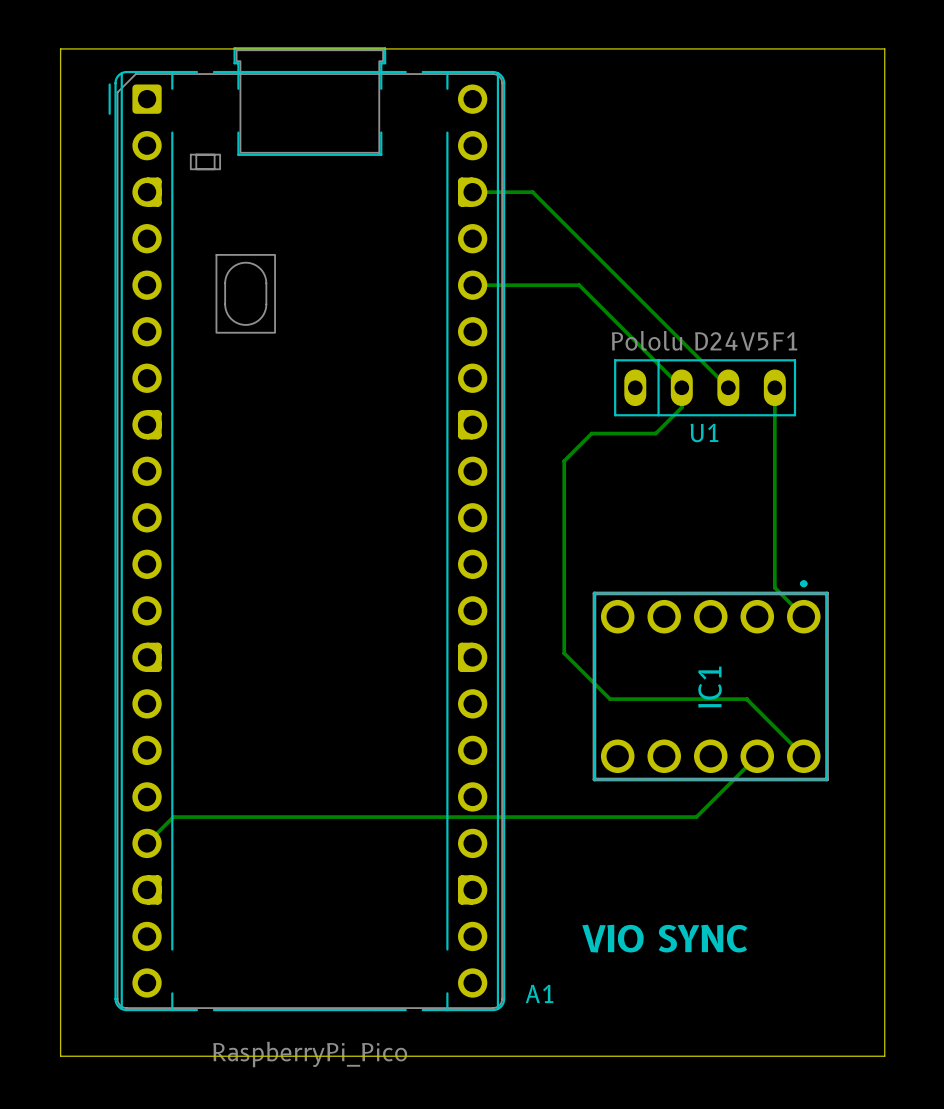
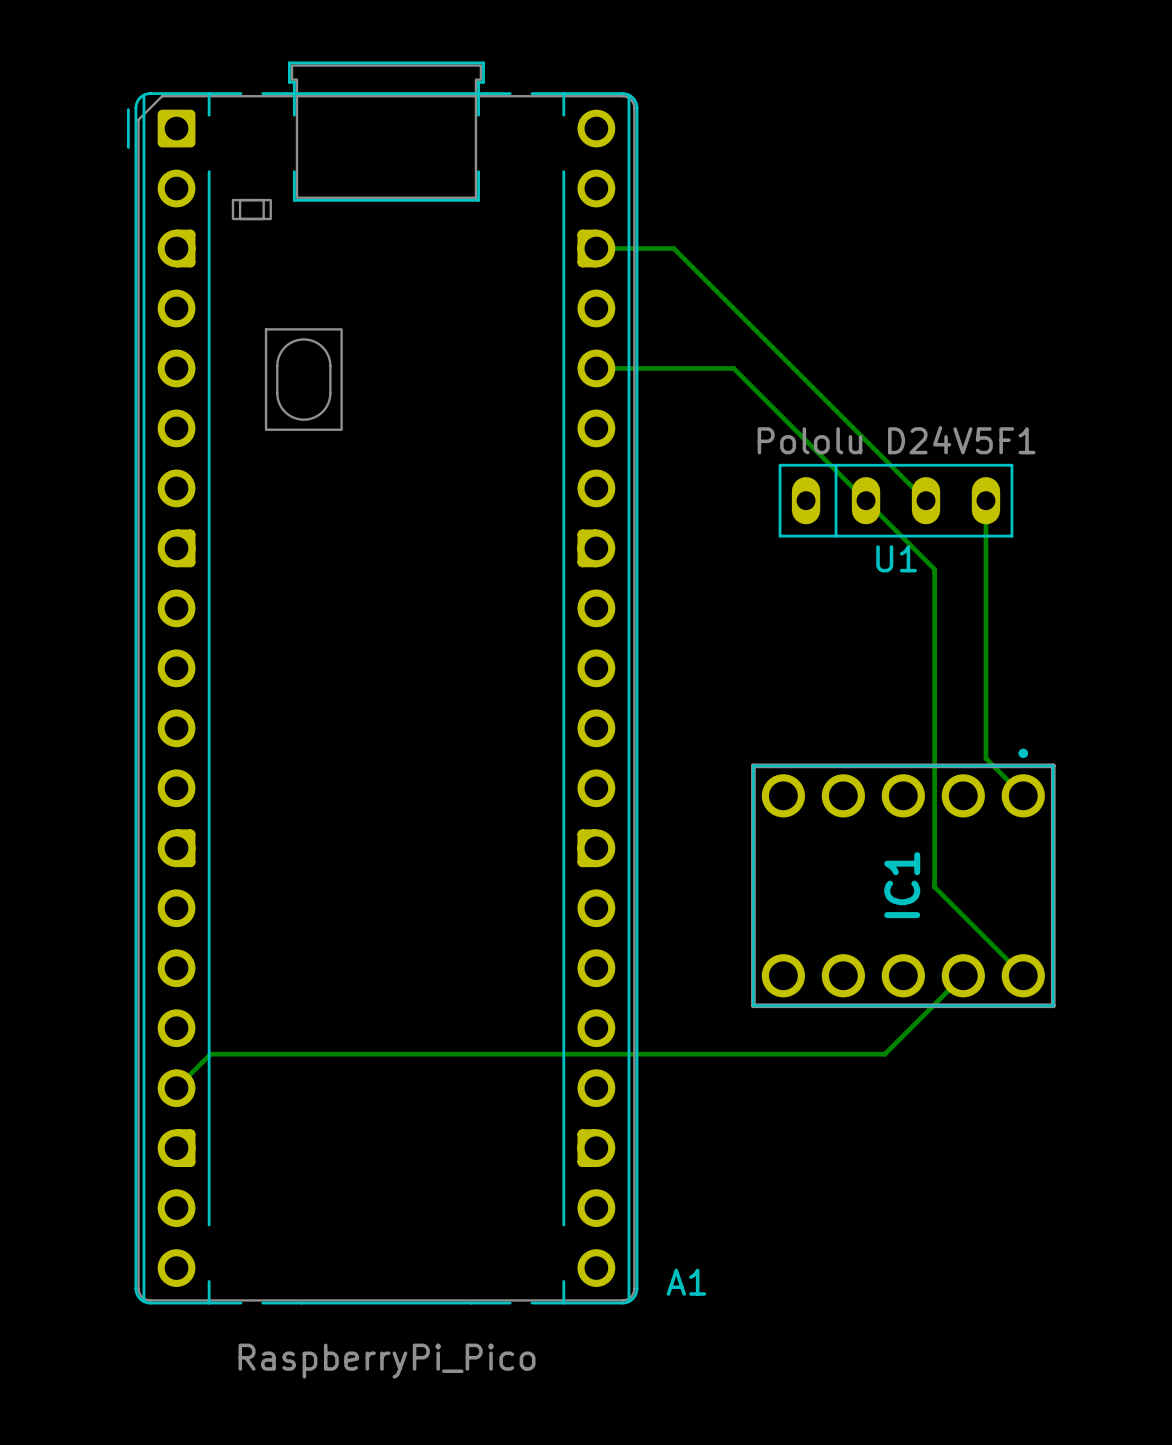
board edge: (60, 48) (884, 48) (884, 1056) (60, 1056) (60, 48) -> none
bottom track: (681, 387) (681, 407) (655, 433) (591, 433) (564, 461) (564, 653) (610, 699) (747, 699) -> (866, 500) (934, 569) (934, 887) (950, 903)
text: VIO SYNC (664, 938) -> none

